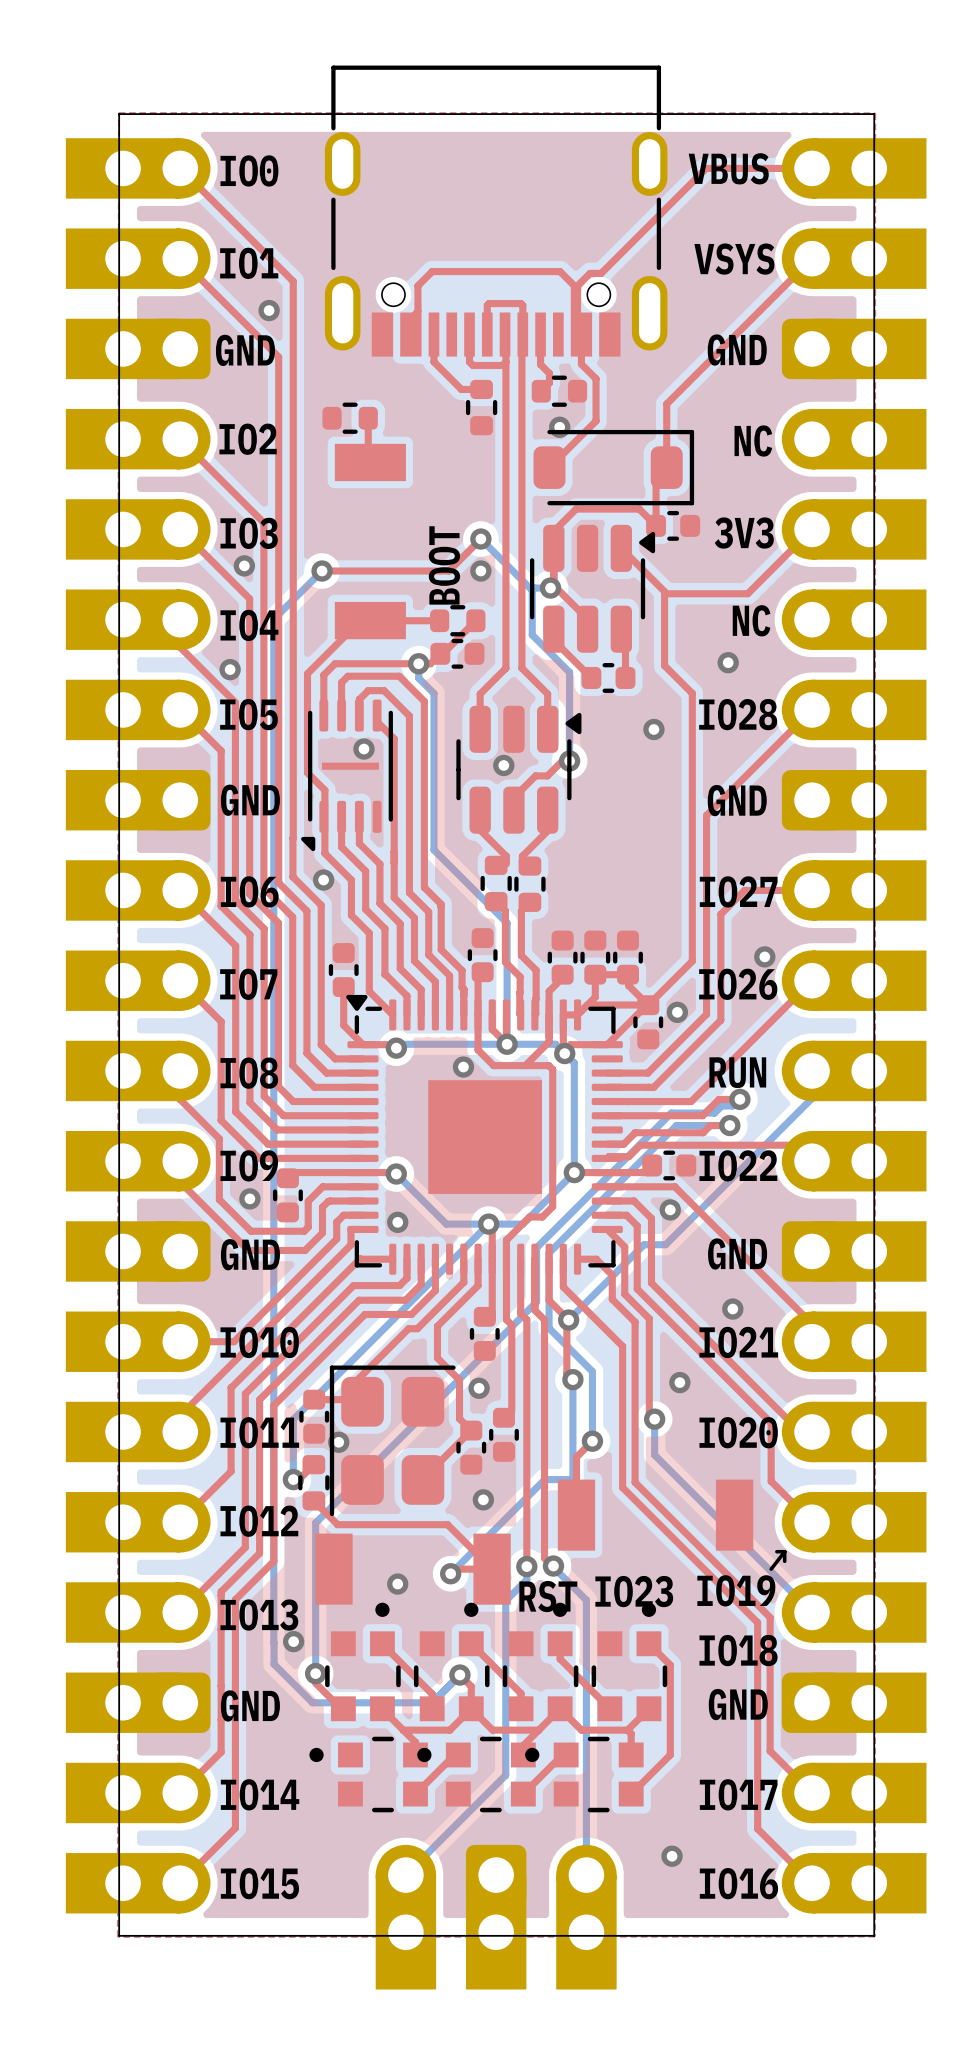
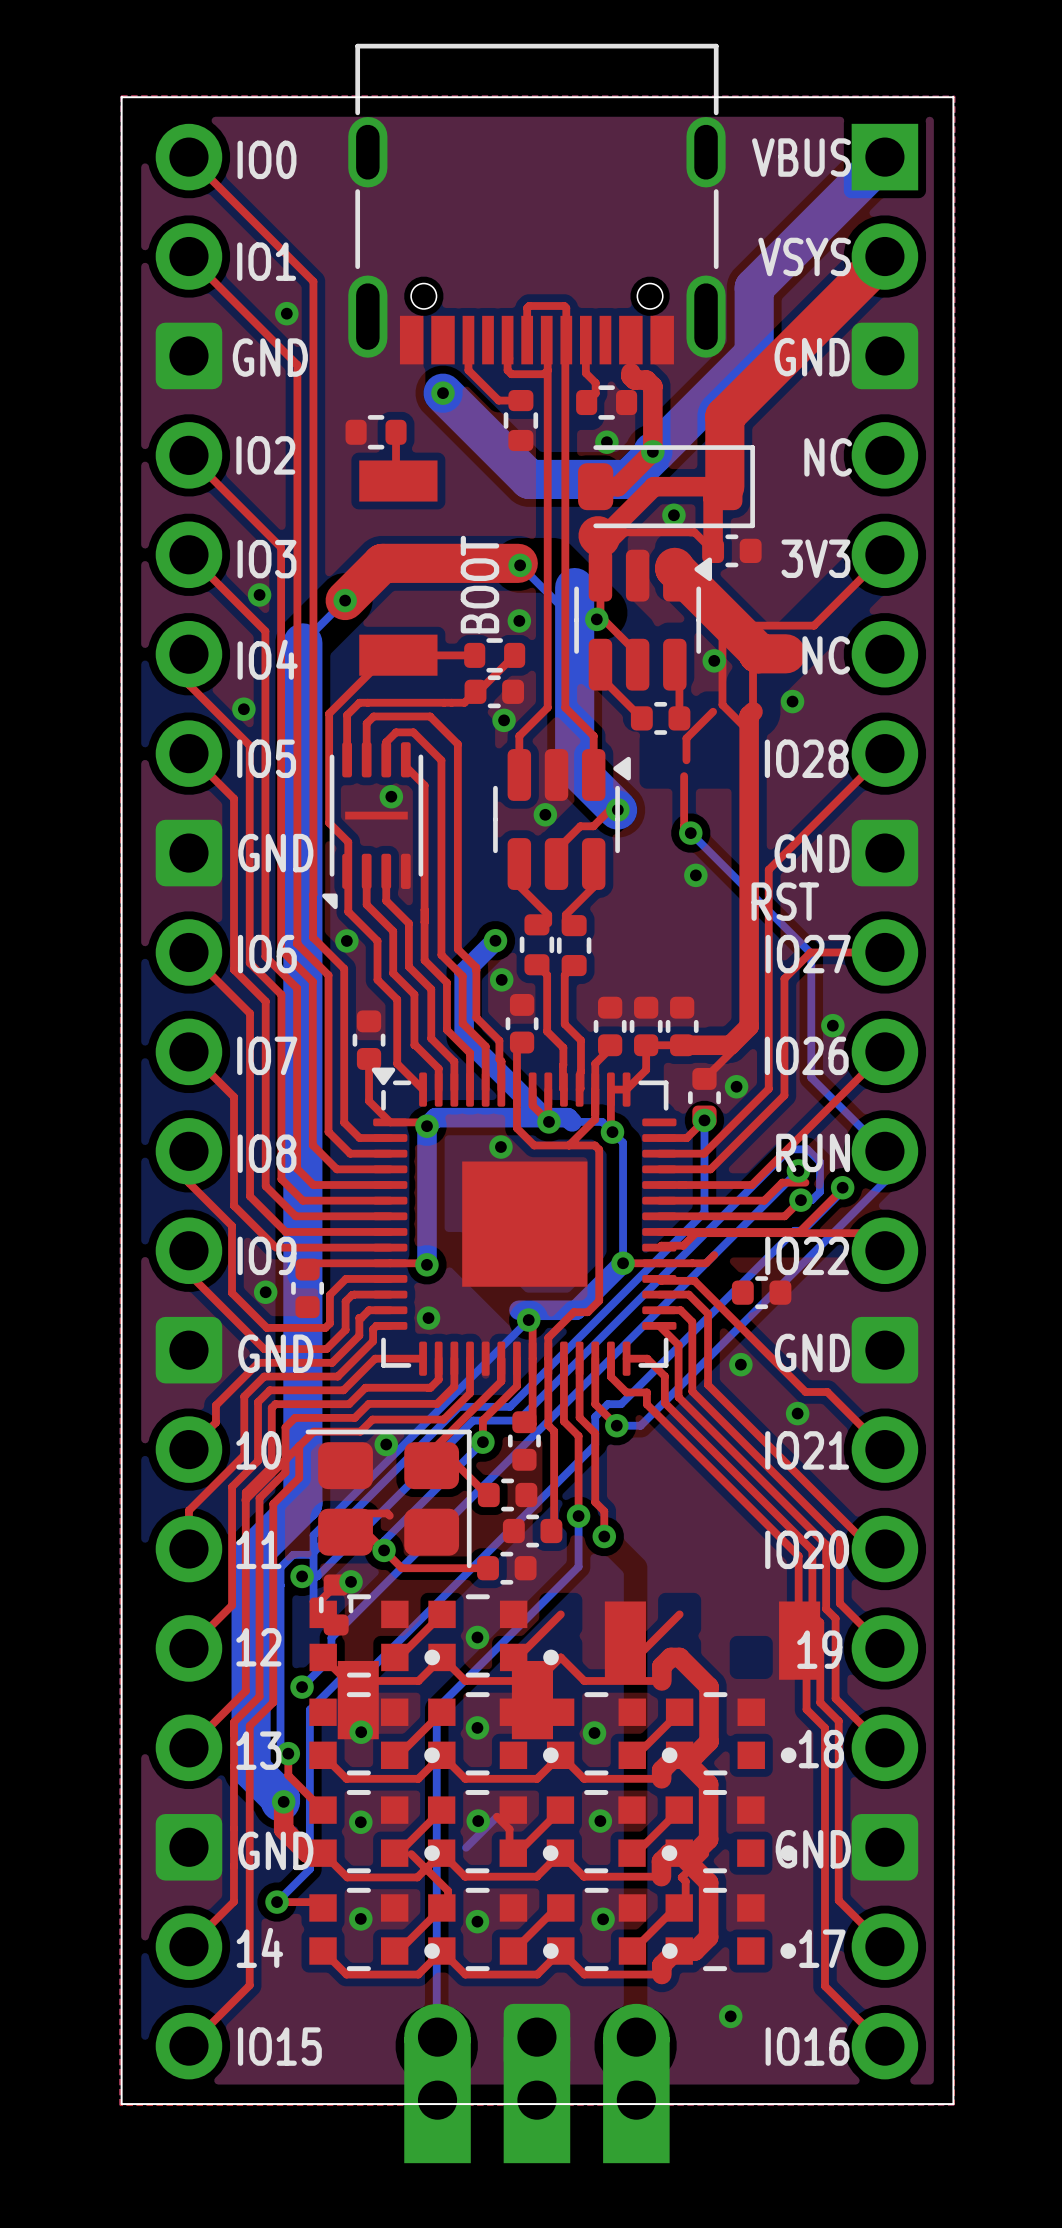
top track: (812, 168) (706, 168) (601, 273) (590, 273) (577, 285) (577, 330) (581, 334) -> none
bottom track: none -> (884, 157) (754, 287) (754, 353) (628, 479) (529, 479) (443, 393)
top track width: thin (812, 258) (666, 404) (666, 467) (656, 478) (656, 525) -> thick (884, 256) (724, 416) (724, 486) (713, 498) (713, 550)
top track: (410, 318) (417, 311) (417, 285) (432, 271) (560, 271) (574, 285) (574, 311) (581, 318) -> none
top track: (581, 364) (596, 378) (596, 421) (549, 467) -> (630, 372) (630, 376) (634, 380) (646, 380) (652, 386) (652, 451) (618, 486) (595, 486)
via: none -> (443, 393)
via: none -> (652, 451)
top track: none -> (724, 486) (654, 486) (605, 535) (598, 535) (600, 538)
via: none -> (673, 515)
top track: (480, 539) (448, 571) (322, 571) -> (518, 563) (382, 563) (345, 600)
top track: none -> (674, 567) (758, 653)
via position: (480, 571) -> (519, 620)
bottom track: (532, 590) (532, 635) (569, 672) (569, 761) -> (574, 587) (574, 767) (617, 810)
bottom track: (283, 609) (273, 619) (273, 1642) -> (302, 642) (302, 1503) (251, 1555) (251, 1769) (280, 1798) (280, 1801)
top track: none -> (758, 653) (785, 653)
via: none -> (714, 660)
bottom track: (418, 663) (418, 678) (433, 693) (433, 849) (507, 923) (507, 1044) (400, 1044) -> none
via: (418, 663) -> none
top track: none -> (713, 711) (686, 738) (686, 760)
via: none -> (504, 720)
via: (653, 729) -> none
top track: none -> (684, 776) (684, 826) (690, 833)
bottom track: none -> (690, 833) (811, 953) (811, 1077) (884, 1151)
via: none -> (690, 833)
via: none -> (695, 875)
bottom track: none -> (495, 940) (464, 972) (464, 1037) (548, 1121)
via: none -> (495, 940)
via: none -> (501, 979)
top track: (628, 974) (628, 985) (648, 1005) (607, 1044) (570, 1044) (570, 1047) (564, 1053) -> (682, 1045) (730, 1045) (749, 1026) (749, 715) (753, 711) (753, 653) (758, 653)
top track: (587, 1005) (648, 1005) -> none
part: (138, 1025) -> none
part: none -> (188, 1101)
part: none -> (884, 1101)
part: (854, 1025) -> none
top track: none -> (704, 1120) (686, 1138) (659, 1138)
bottom track: none -> (704, 1120) (704, 1212) (509, 1406) (459, 1406) (311, 1554) (293, 1554) (280, 1567) (280, 1753)
via: none -> (704, 1120)
bottom track: none -> (572, 1121) (567, 1117) (435, 1117) (427, 1126) (427, 1264)
bottom track: none -> (798, 1170) (331, 1637) (331, 1657) (302, 1687)
via: none -> (798, 1170)
bottom track: (739, 1099) (732, 1105) (721, 1105) (714, 1113) (671, 1113) (536, 1247) (536, 1302) (315, 1522) (315, 1673) -> none
via: (739, 1099) -> none
via: none -> (842, 1187)
top track: none -> (800, 1200) (784, 1216) (659, 1216)
bottom track: none -> (800, 1200) (811, 1200) (819, 1192) (819, 1161) (807, 1149) (789, 1149) (518, 1420) (473, 1420) (317, 1576) (302, 1576)
via: none -> (800, 1200)
top track: (729, 1125) (710, 1125) (703, 1132) (635, 1132) (623, 1144) -> (842, 1187) (799, 1231) (677, 1231)
bottom track: (729, 1125) (676, 1125) (549, 1252) (549, 1311) -> (842, 1187) (842, 1190) (802, 1230) (794, 1230) (621, 1404) (607, 1404) (595, 1416)
via: (729, 1125) -> none
part position: (669, 1165) -> (761, 1292)
bottom track width: thin (574, 1172) (531, 1215) -> thick (623, 1263) (576, 1310)
bottom track: (396, 1174) (446, 1224) (522, 1224) (531, 1215) -> (518, 1310) (576, 1310)
top track: (607, 1186) (674, 1186) (812, 1323) (812, 1341) -> (659, 1278) (661, 1280) (694, 1280) (805, 1392) (827, 1392) (884, 1449)
via position: (670, 1209) -> (740, 1364)
top track: (336, 1222) (336, 1238) (233, 1341) (180, 1341) -> (361, 1317) (359, 1317) (359, 1335) (332, 1362) (258, 1362) (215, 1405) (215, 1422) (188, 1449)
top track: (350, 1229) (350, 1244) (180, 1415) -> (376, 1325) (373, 1329) (373, 1341) (337, 1376) (264, 1376) (244, 1396) (244, 1455) (188, 1510) (188, 1530)
bottom track: (665, 1244) (643, 1244) (568, 1320) -> (723, 1342) (640, 1425) (616, 1425)
top track: (360, 1258) (293, 1325) -> (392, 1419) (372, 1419) (360, 1431) (313, 1431)
top track: (563, 1275) (563, 1287) (622, 1346) (622, 1487) (757, 1622) -> (610, 1376) (626, 1392) (646, 1392) (646, 1404) (798, 1556) (798, 1620) (806, 1628) (806, 1709) (825, 1727) (825, 1759)
top track: (463, 1279) (463, 1282) (417, 1328) (408, 1328) (346, 1390) -> (501, 1381) (431, 1451) (431, 1464) (457, 1464) (489, 1497)
top track: (478, 1284) (437, 1326) (437, 1358) (459, 1380) (459, 1418) (471, 1430) (422, 1479) -> (516, 1386) (482, 1420) (482, 1442)
top track: (353, 1285) (245, 1393) (245, 1547) (231, 1560) -> (379, 1387) (365, 1387) (349, 1404) (275, 1404) (271, 1407) (271, 1466) (245, 1492) (245, 1691)
top track: (359, 1300) (259, 1399) (259, 1553) (221, 1591) -> (385, 1403) (368, 1403) (354, 1417) (295, 1417) (285, 1427) (285, 1472) (259, 1498) (259, 1696) (234, 1722) (233, 1725)
top track: (534, 1310) (544, 1319) (544, 1558) (553, 1566) -> (579, 1414) (579, 1417) (595, 1433) (595, 1502) (604, 1511) (604, 1536)
top track: (520, 1313) (526, 1319) (526, 1566) -> (563, 1418) (563, 1421) (578, 1436) (578, 1516)
top track: (364, 1314) (273, 1405) (273, 1561) (235, 1599) -> (299, 1446) (299, 1478) (273, 1503) (273, 1702) (249, 1725) (249, 1733)
top track: (649, 1318) (649, 1419) -> (705, 1424) (826, 1544) (826, 1609) (835, 1618) (835, 1698) (884, 1747)
top track: (568, 1320) (566, 1321) (566, 1373) (572, 1379) -> none
top track: (635, 1322) (635, 1482) (770, 1617) -> (689, 1428) (812, 1550) (812, 1614) (820, 1622) (820, 1702) (838, 1721) (838, 1753)
bottom track: (549, 1328) (592, 1371) (592, 1441) -> (595, 1434) (595, 1444) (366, 1674) (345, 1674) (309, 1709) (309, 1869) (277, 1902)
bottom track: none -> (482, 1442) (384, 1541) (384, 1550)
via: none -> (482, 1442)
via: none -> (386, 1444)
text: IO10 (259, 1342) -> 10 (258, 1450)
bottom track: (572, 1379) (572, 1479) (544, 1479) (450, 1573) -> none
via: (572, 1379) -> none
part: none -> (507, 1495)
via: (679, 1382) -> none
top track: (231, 1387) (231, 1471) (219, 1483) -> (387, 1358) (375, 1358) (343, 1390) (269, 1390) (258, 1402) (258, 1460) (232, 1486) (232, 1605)
via: (479, 1388) -> none
bottom track: none -> (578, 1516) (578, 1566) (436, 1708) (436, 2045)
via: none -> (578, 1516)
top track: none -> (345, 1531) (365, 1531) (401, 1568) (488, 1568)
part: (314, 1416) -> none
bottom track: (654, 1419) (654, 1455) (812, 1612) -> none
via: (654, 1419) -> none
via: none -> (604, 1536)
text: IO11 (259, 1432) -> 11 (258, 1549)
via: none -> (384, 1550)
part rotation: 0° (503, 1434) -> 90° clockwise (532, 1531)
part rotation: 0° (392, 1440) -> 90° clockwise (388, 1498)
top track: (592, 1441) (576, 1457) (576, 1515) -> none
via: (592, 1441) -> none
via: (338, 1442) -> none
part rotation: 0° (471, 1447) -> 90° clockwise (506, 1568)
via: none -> (302, 1576)
via: none -> (351, 1581)
via: (293, 1479) -> none
top track: none -> (442, 1614) (398, 1657) (394, 1657)
top track: none -> (560, 1614) (517, 1657) (513, 1657)
top track: none -> (679, 1614) (636, 1657) (632, 1657)
via: (483, 1499) -> none
top track: (313, 1500) (337, 1524) (447, 1524) (492, 1569) (455, 1569) (450, 1573) -> none
part: none -> (374, 1635)
part: none -> (493, 1635)
via: none -> (477, 1637)
text: IO12 (259, 1521) -> 12 (258, 1647)
text: none -> 19 (819, 1649)
top track: none -> (323, 1657) (346, 1680) (418, 1680) (442, 1657) (465, 1680) (537, 1680) (560, 1657) (584, 1680) (656, 1680)
top track: none -> (661, 1680) (661, 1666) (670, 1657) (679, 1657) (709, 1686) (709, 1741) (695, 1755) (676, 1755) (661, 1770) (661, 1778)
line: (776, 1551) (784, 1551) -> none
line: (784, 1551) (784, 1561) -> none
line: (784, 1551) (771, 1569) -> none
via: none -> (302, 1687)
bottom track: (526, 1566) (526, 1579) (505, 1600) (505, 1775) (405, 1875) -> none
via: (526, 1566) -> none
bottom track: (553, 1566) (586, 1600) (586, 1875) -> none
via: (553, 1566) -> none
via position: (450, 1573) -> (477, 1727)
top track: none -> (441, 1712) (398, 1755)
top track: none -> (679, 1712) (636, 1755) (632, 1755)
via: (397, 1584) -> none
text: IO19 (736, 1590) -> none
text: IO23 (634, 1591) -> none
text position: RST (548, 1596) -> RST (785, 901)
via: none -> (361, 1732)
via: none -> (594, 1732)
part: none -> (374, 1733)
part: none -> (493, 1733)
part: none -> (612, 1733)
part: none -> (731, 1733)
text: IO13 (259, 1615) -> 13 (258, 1750)
top track: none -> (288, 1753) (288, 1775) (323, 1810)
via: none -> (288, 1753)
top track: none -> (323, 1755) (346, 1778) (418, 1778) (441, 1755) (465, 1778) (537, 1778) (560, 1755) (584, 1778) (656, 1778)
top track: none -> (679, 1755) (708, 1784) (708, 1839) (694, 1853) (669, 1853) (661, 1861) (661, 1876)
via: (293, 1641) -> none
bottom track: (274, 1643) (274, 1664) (312, 1702) (432, 1702) -> none
top track: (382, 1643) (432, 1694) (432, 1708) -> none
top track: (471, 1643) (521, 1693) (521, 1708) -> none
top track: (560, 1643) (560, 1659) (609, 1708) -> none
top track: (648, 1643) (670, 1665) (670, 1754) (631, 1794) -> none
text: IO18 (738, 1650) -> 18 (821, 1749)
top track: none -> (283, 1801) (283, 1829) (307, 1853) (323, 1853) (347, 1877) (417, 1877) (441, 1853) (465, 1876) (536, 1876) (560, 1853) (583, 1876) (655, 1876)
via: none -> (283, 1801)
part rotation: 0° (362, 1661) -> 90° clockwise (374, 1831)
part rotation: 0° (451, 1661) -> 90° clockwise (493, 1831)
part: (540, 1661) -> none
part: (629, 1661) -> none
top track: none -> (441, 1810) (398, 1853) (394, 1853)
top track: none -> (560, 1810) (517, 1853) (513, 1853)
top track: none -> (679, 1810) (636, 1853) (632, 1853)
via position: (315, 1673) -> (360, 1822)
top track: (316, 1673) (316, 1683) (341, 1709) -> none
via position: (459, 1675) -> (478, 1821)
via: none -> (600, 1821)
part: none -> (612, 1831)
part: none -> (730, 1831)
top track: none -> (679, 1853) (708, 1882) (708, 1937) (694, 1951) (675, 1951) (661, 1965) (661, 1974)
top track: (403, 1730) (449, 1730) (471, 1708) (492, 1730) (538, 1730) -> none
top track: (627, 1730) (581, 1730) (560, 1708) (523, 1745) (523, 1754) -> none
top track: none -> (277, 1902) (317, 1902) (323, 1907)
via: none -> (277, 1902)
top track: (458, 1754) (454, 1754) (415, 1794) -> (679, 1907) (675, 1907) (632, 1951)
top track: (566, 1754) (562, 1754) (523, 1794) -> (560, 1907) (556, 1907) (513, 1951)
top track: none -> (441, 1907) (398, 1951) (394, 1951)
via: none -> (360, 1918)
via: none -> (603, 1919)
via: none -> (477, 1921)
part rotation: 0° (368, 1774) -> 180° (374, 1929)
part rotation: 0° (476, 1774) -> 180° (493, 1929)
part rotation: 0° (584, 1774) -> 180° (612, 1929)
part: none -> (730, 1929)
text: IO14 (260, 1794) -> 14 (259, 1947)
text: IO17 (738, 1794) -> 17 (822, 1948)
top track: none -> (323, 1951) (346, 1974) (418, 1974) (441, 1951) (465, 1974) (537, 1974) (560, 1951) (584, 1974) (655, 1974)

